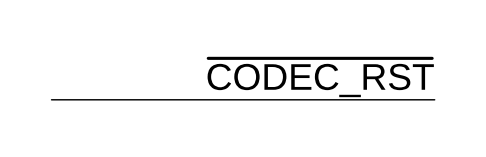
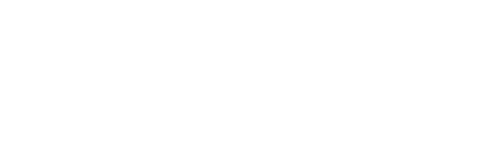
label: ~{CODEC_RST} (320, 77) -> none
wire: (51, 99) (434, 99) -> none

